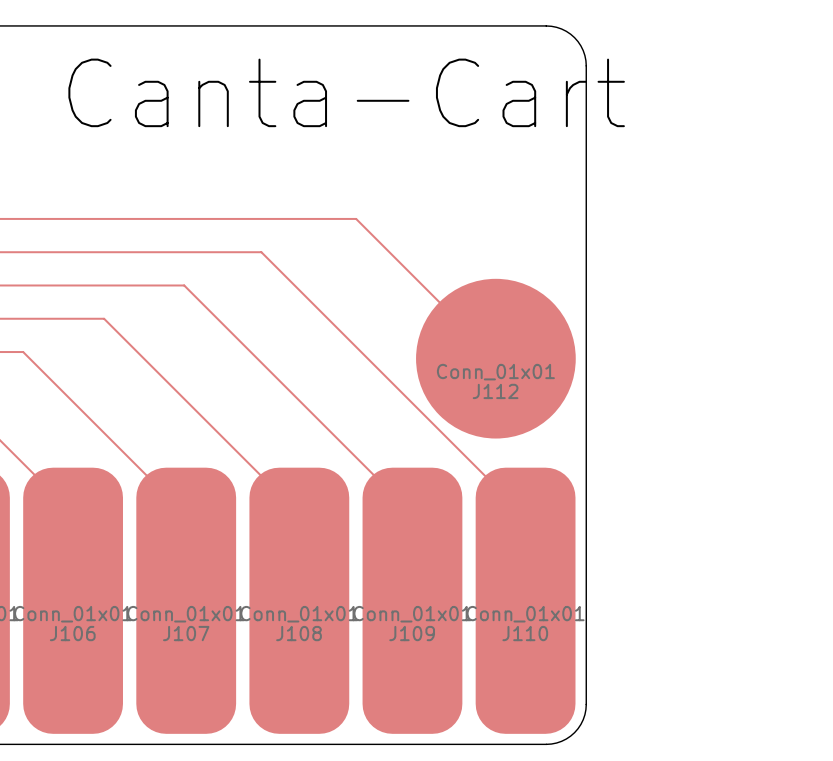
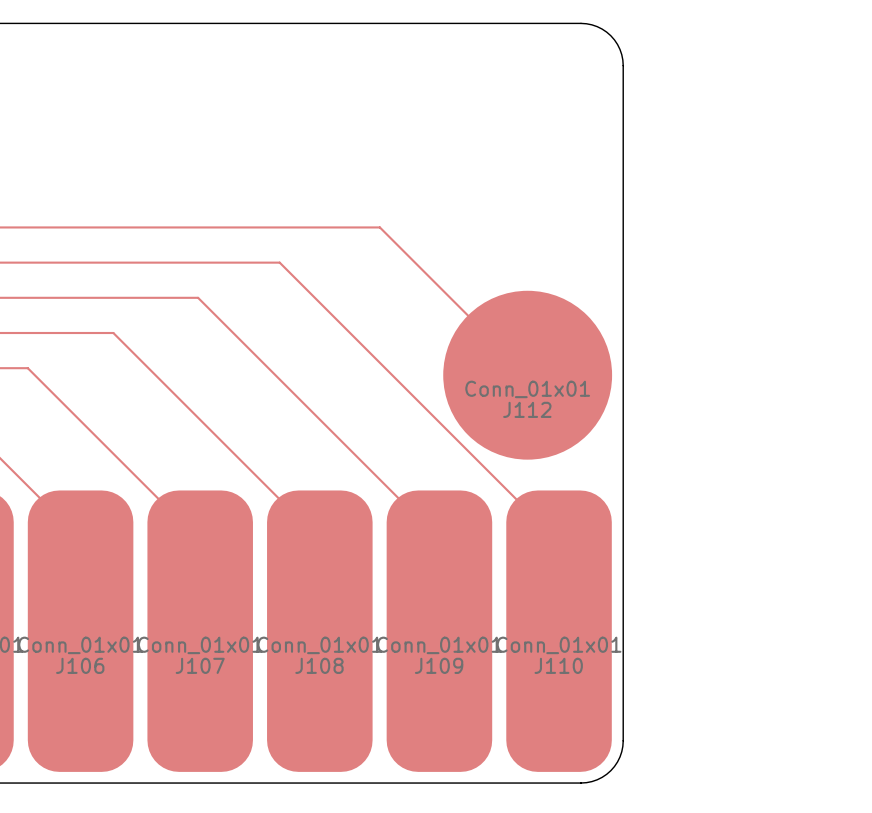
text: Canta-Cart (346, 92) -> none

